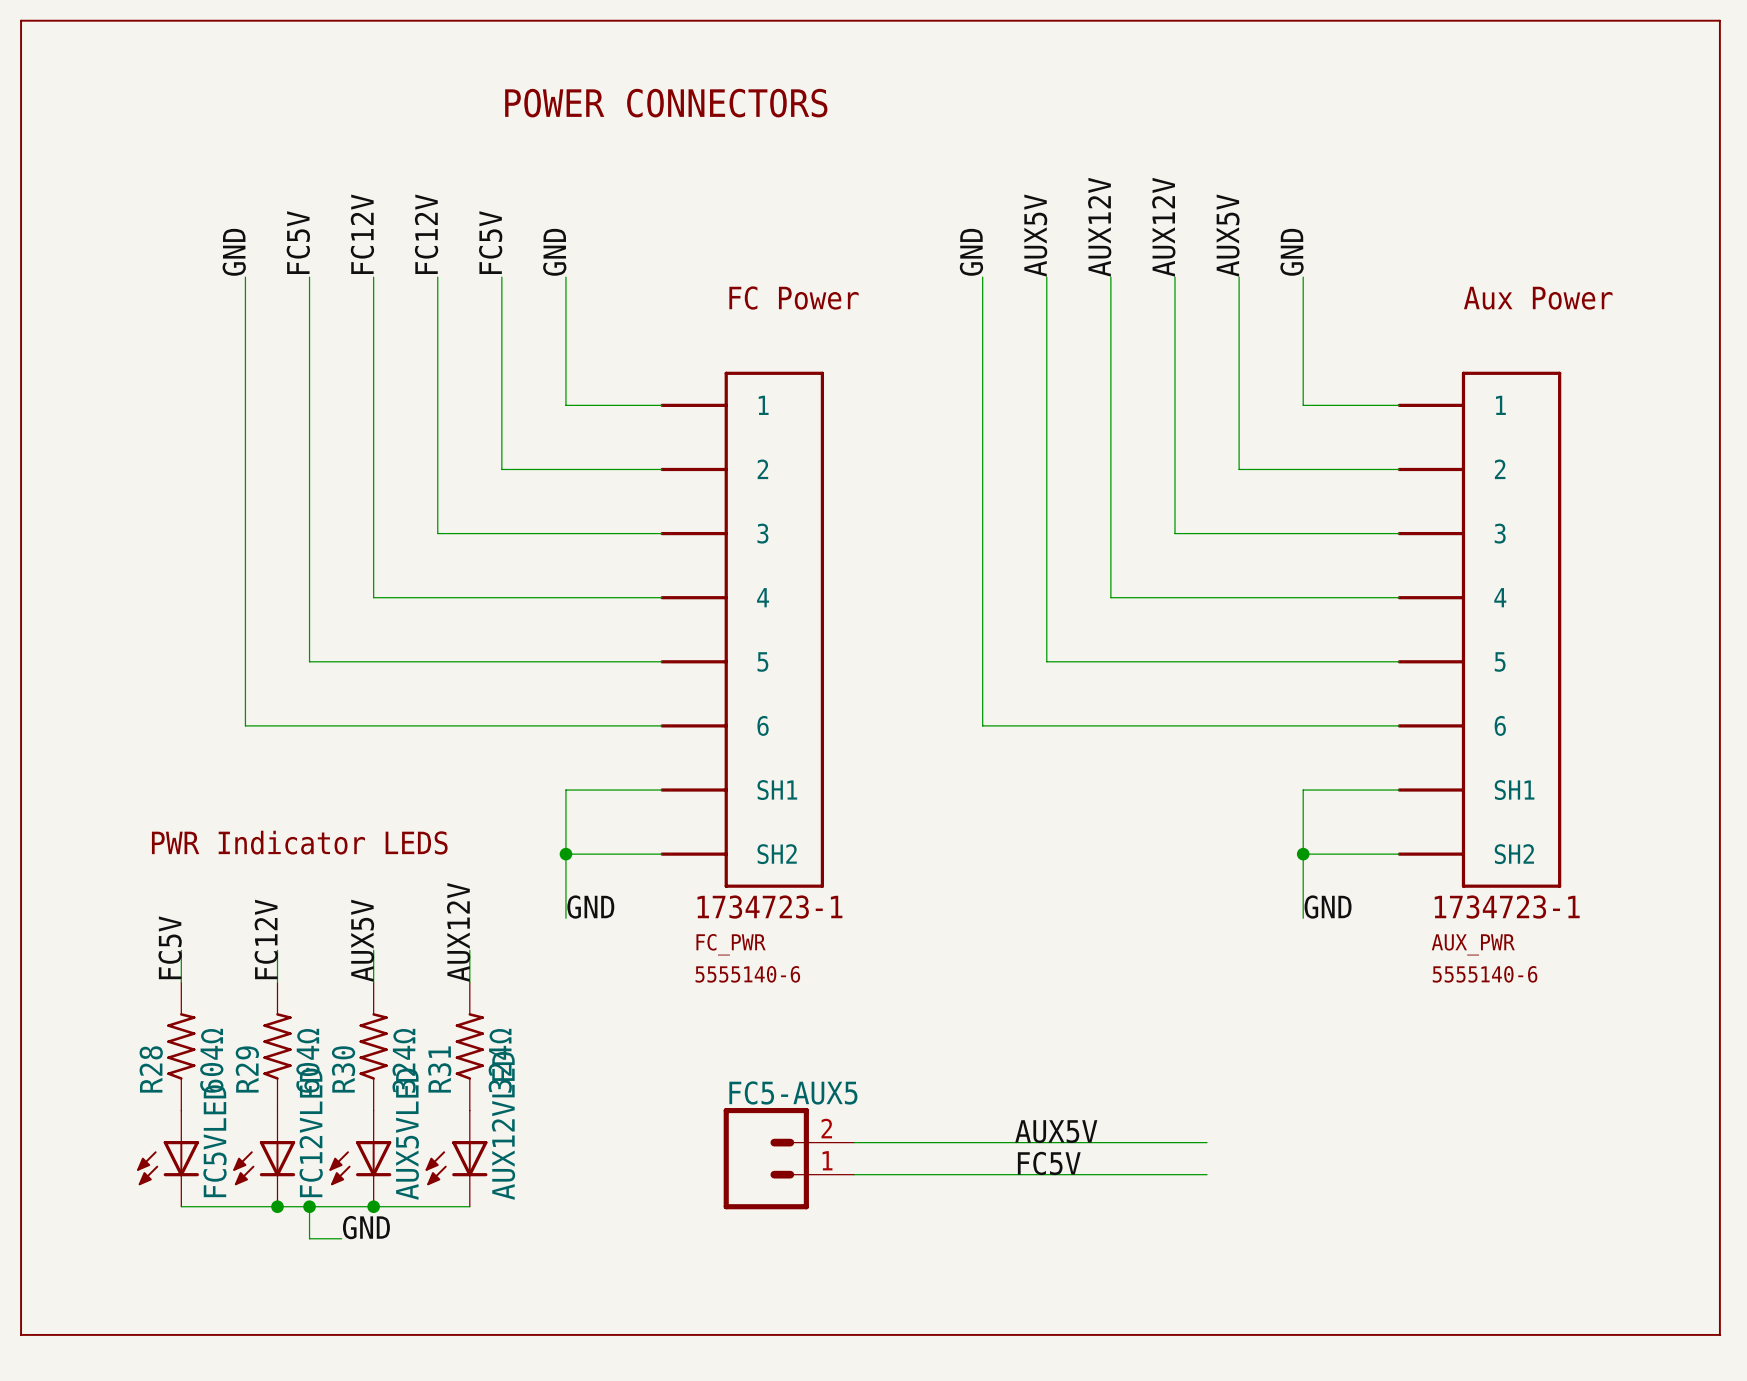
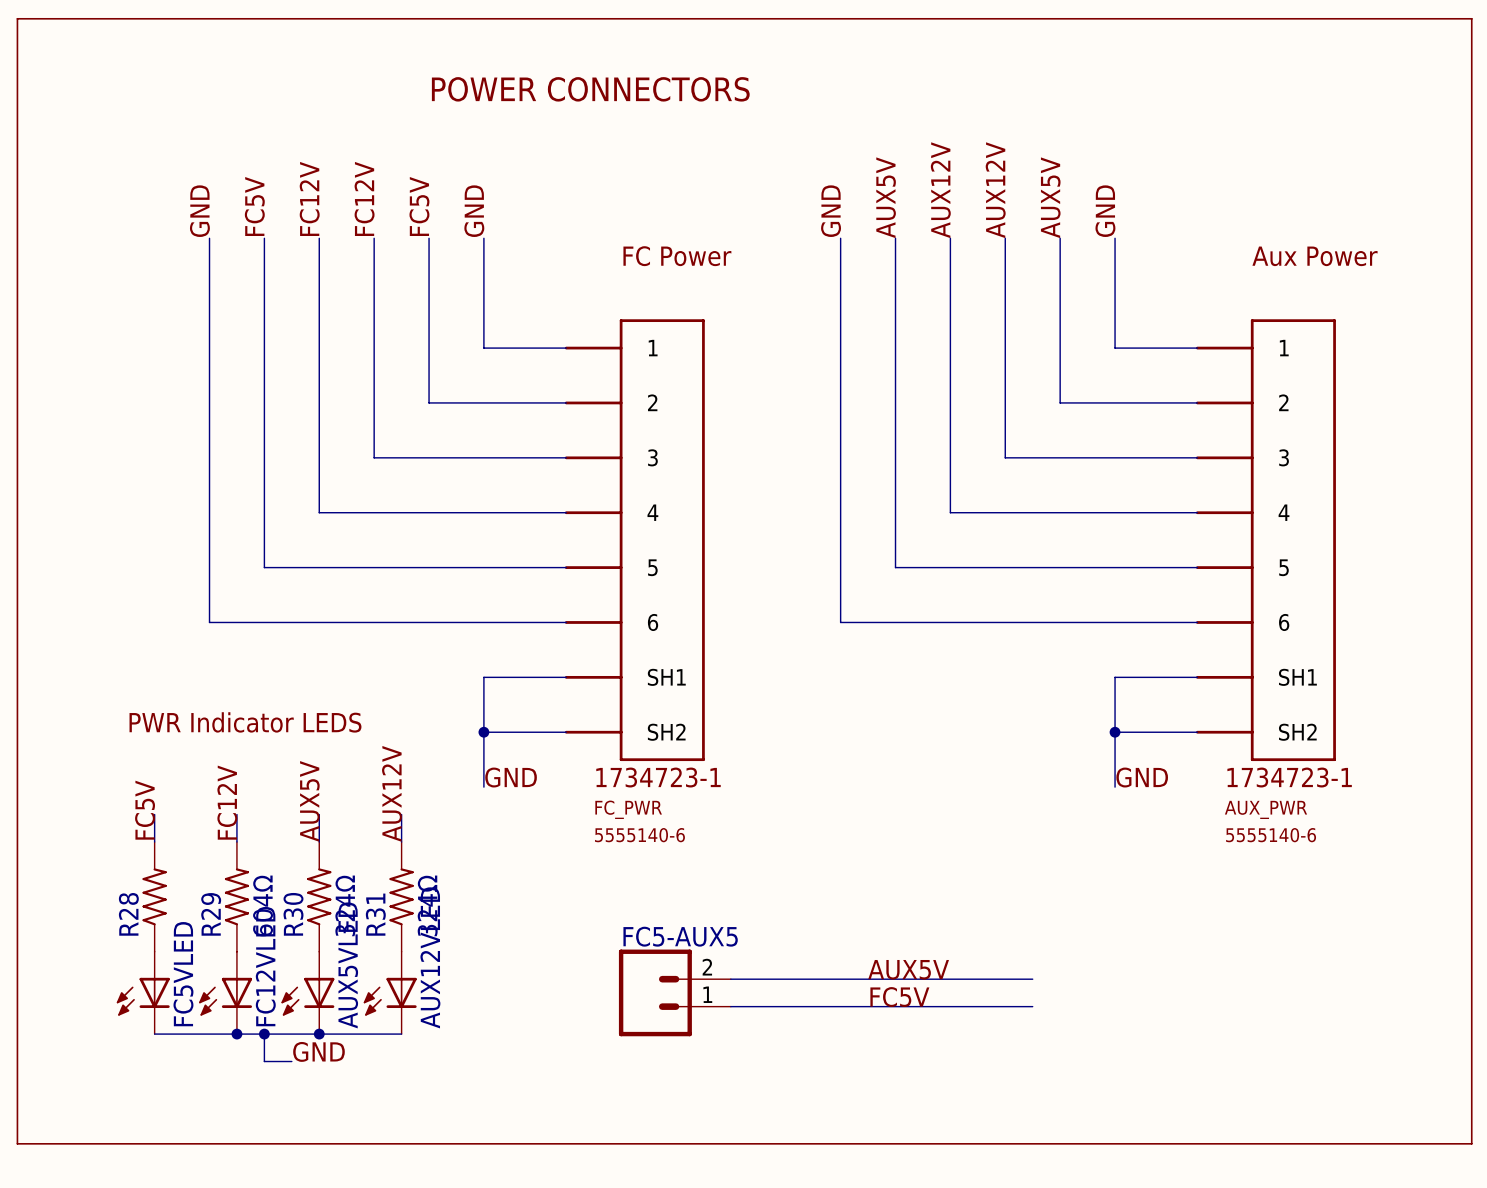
R28 value: 604Ω (211, 1060) -> none

